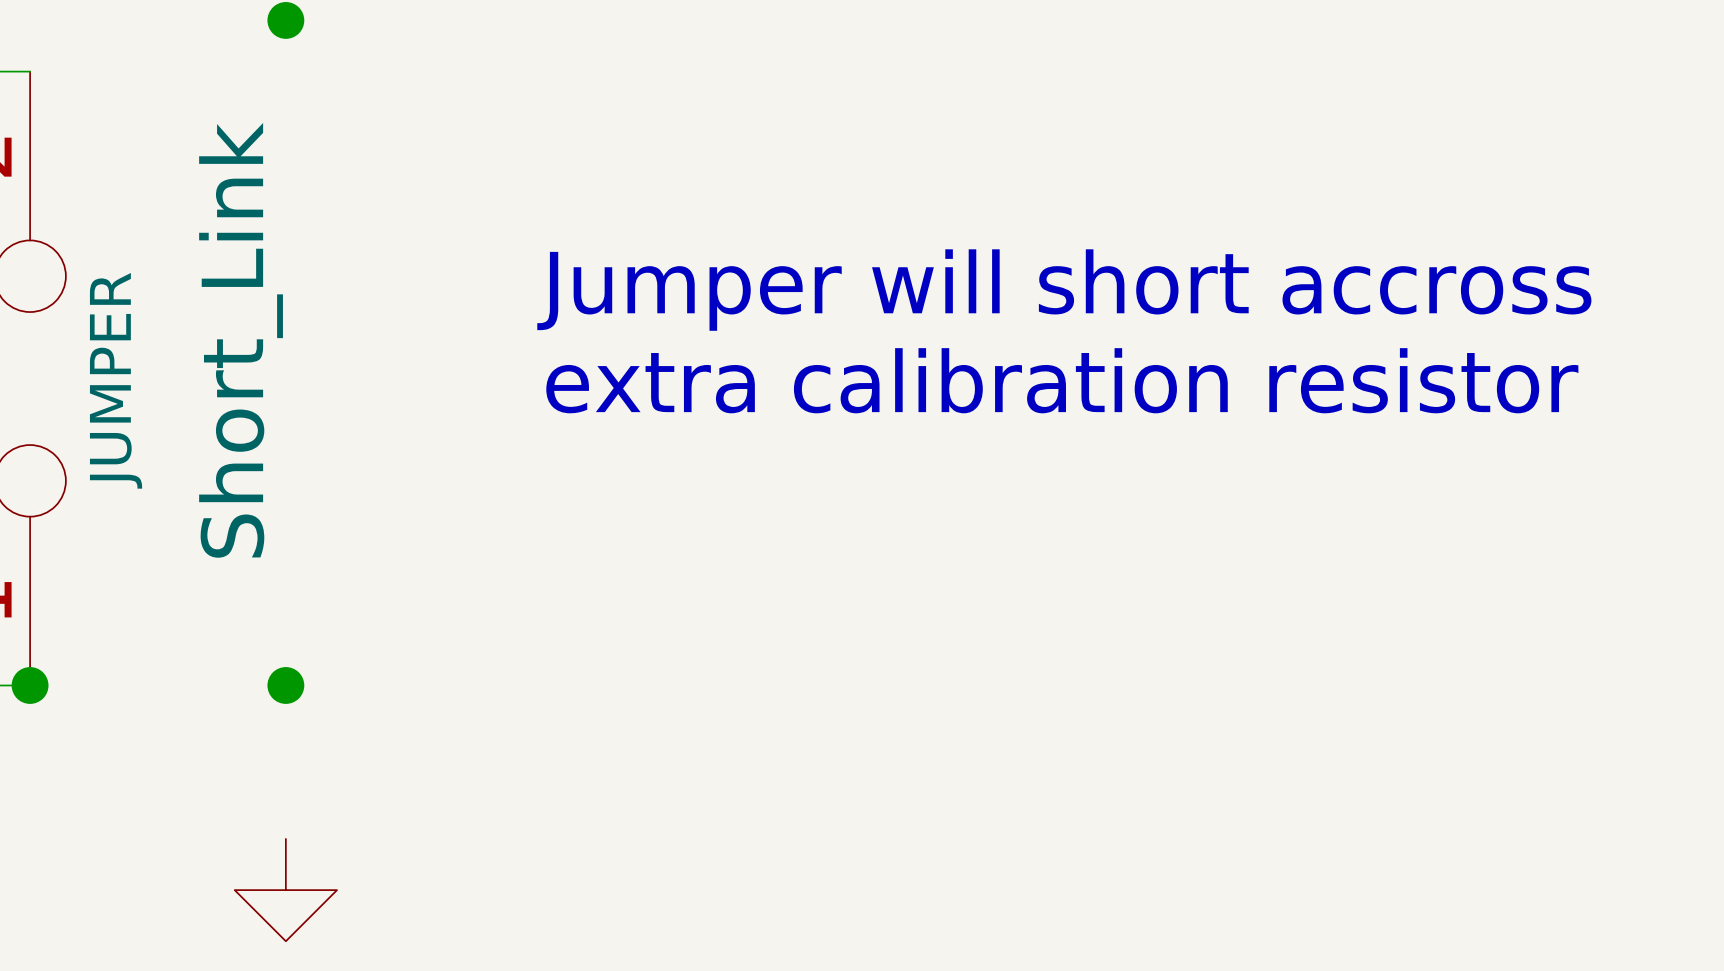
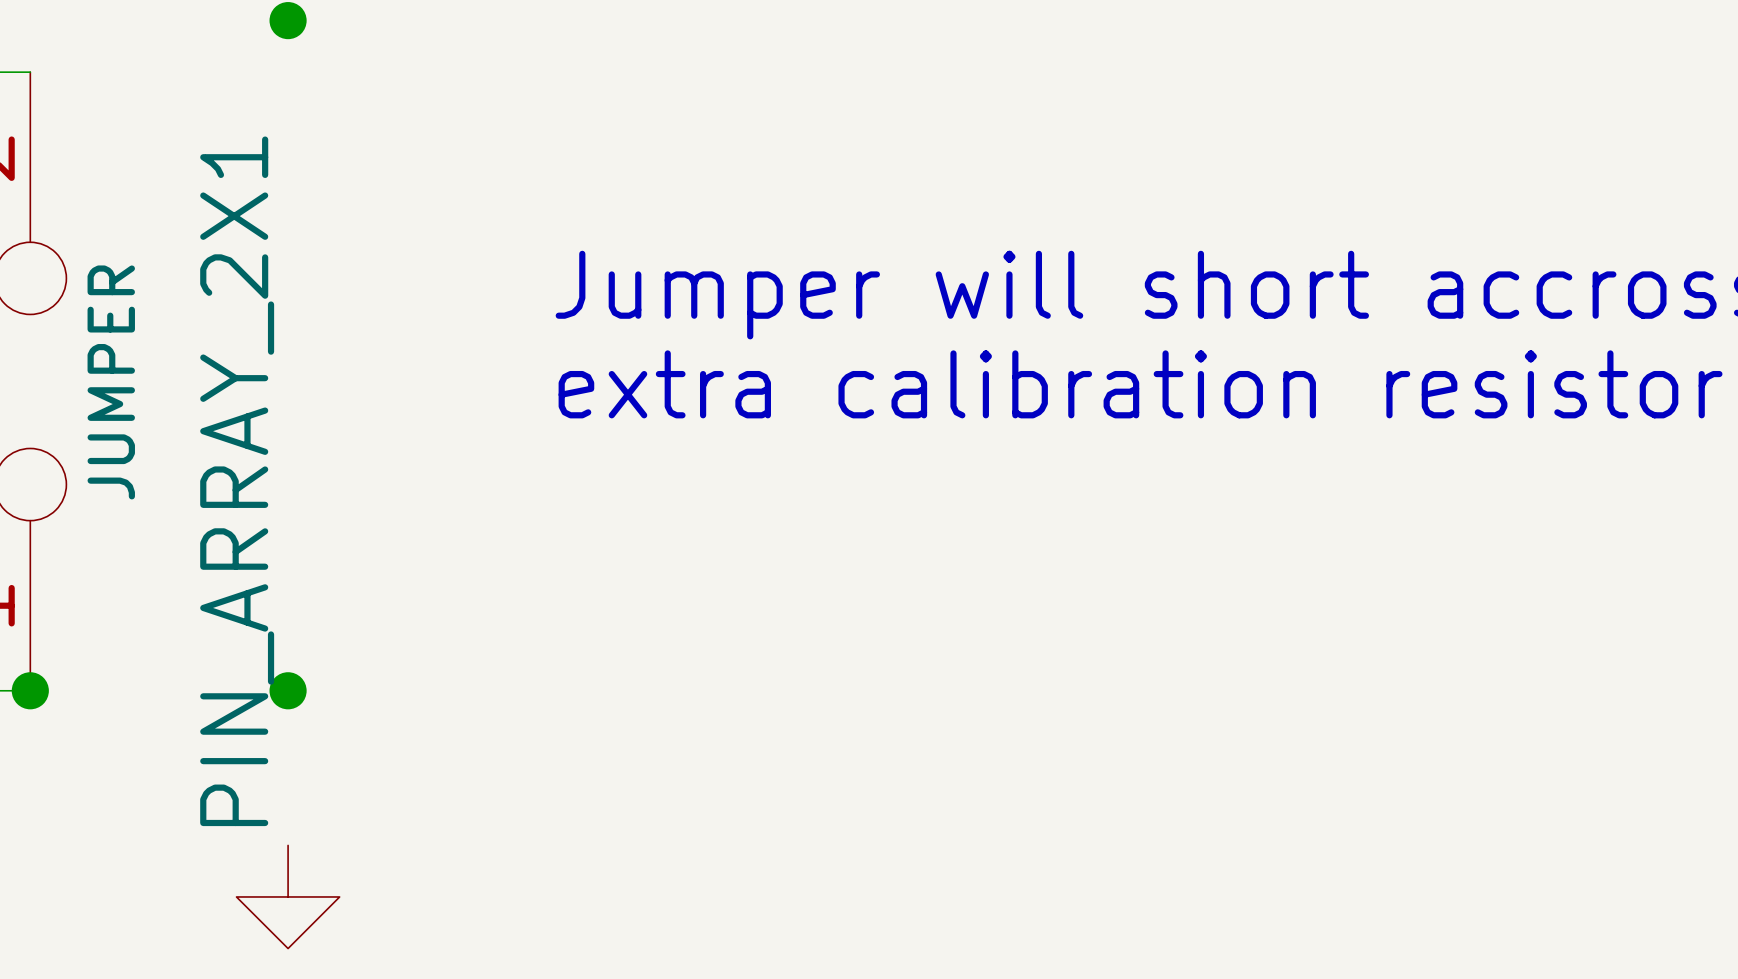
part text: Short_Link (241, 340) -> PIN_ARRAY_2X1 (237, 481)

